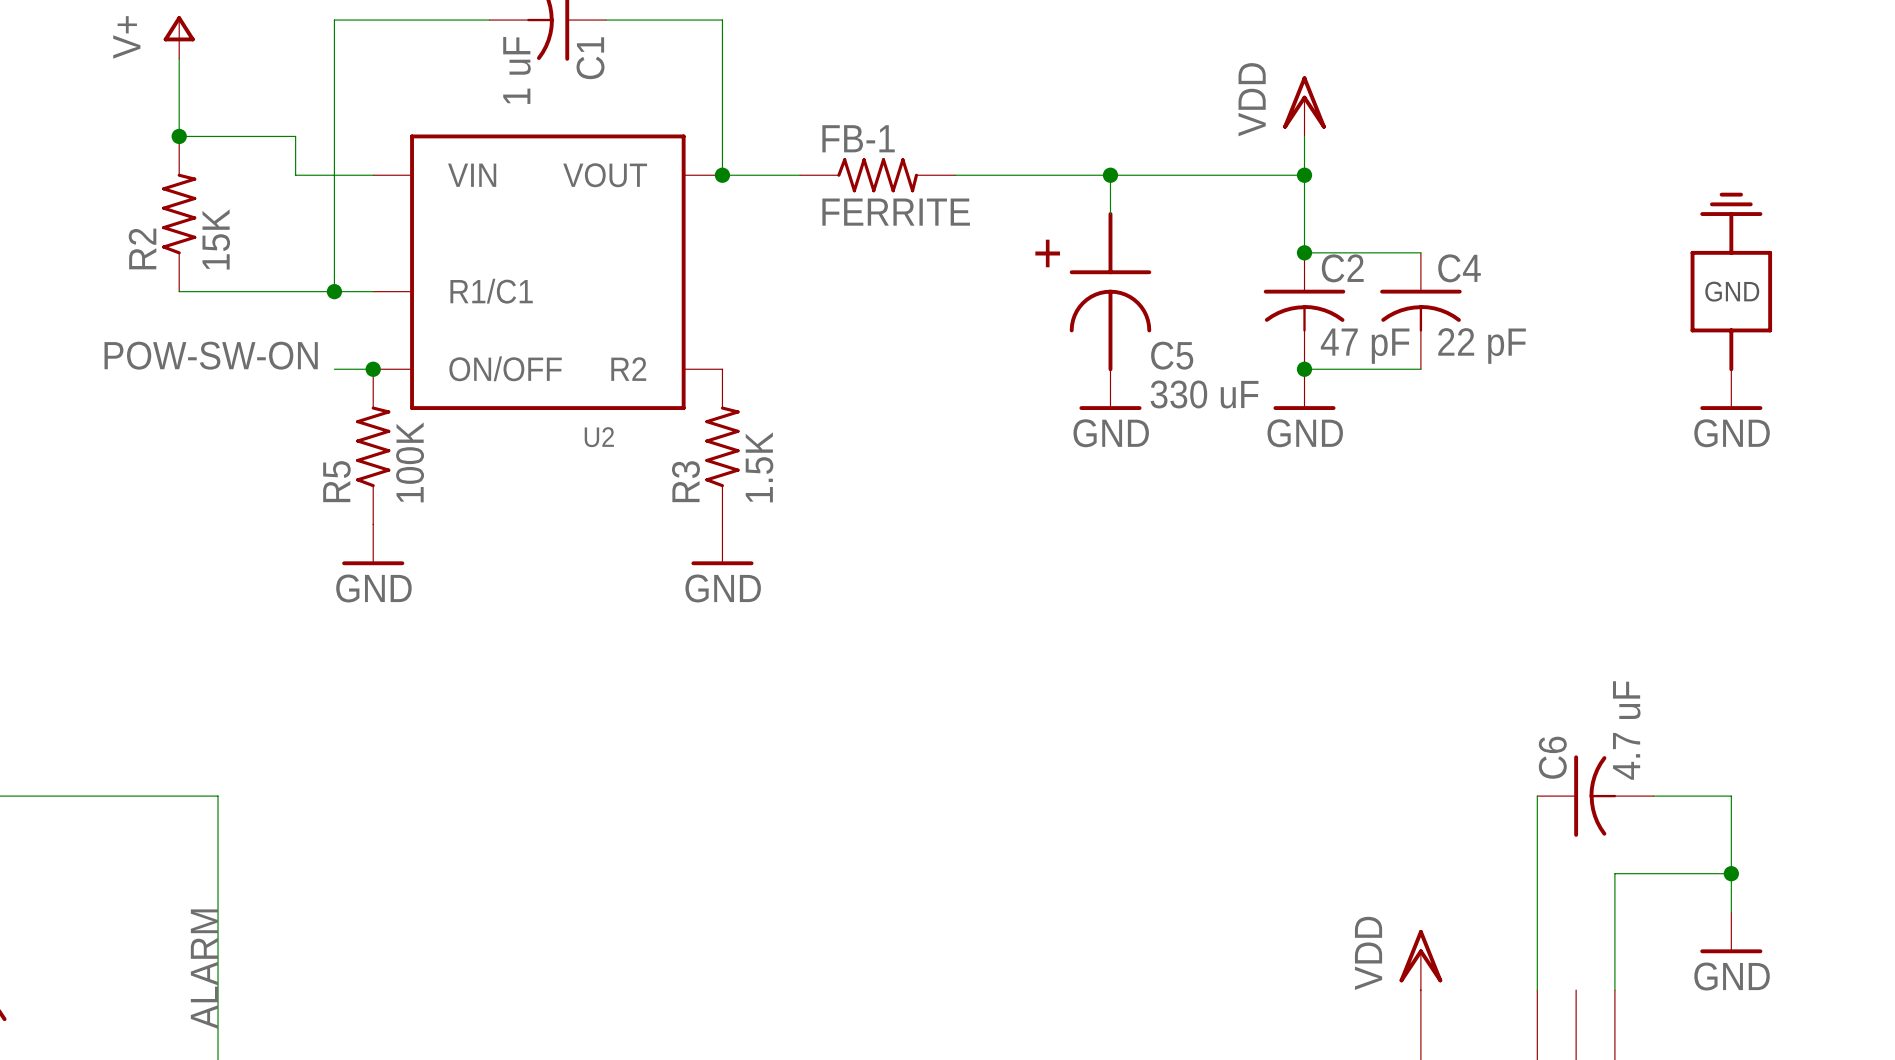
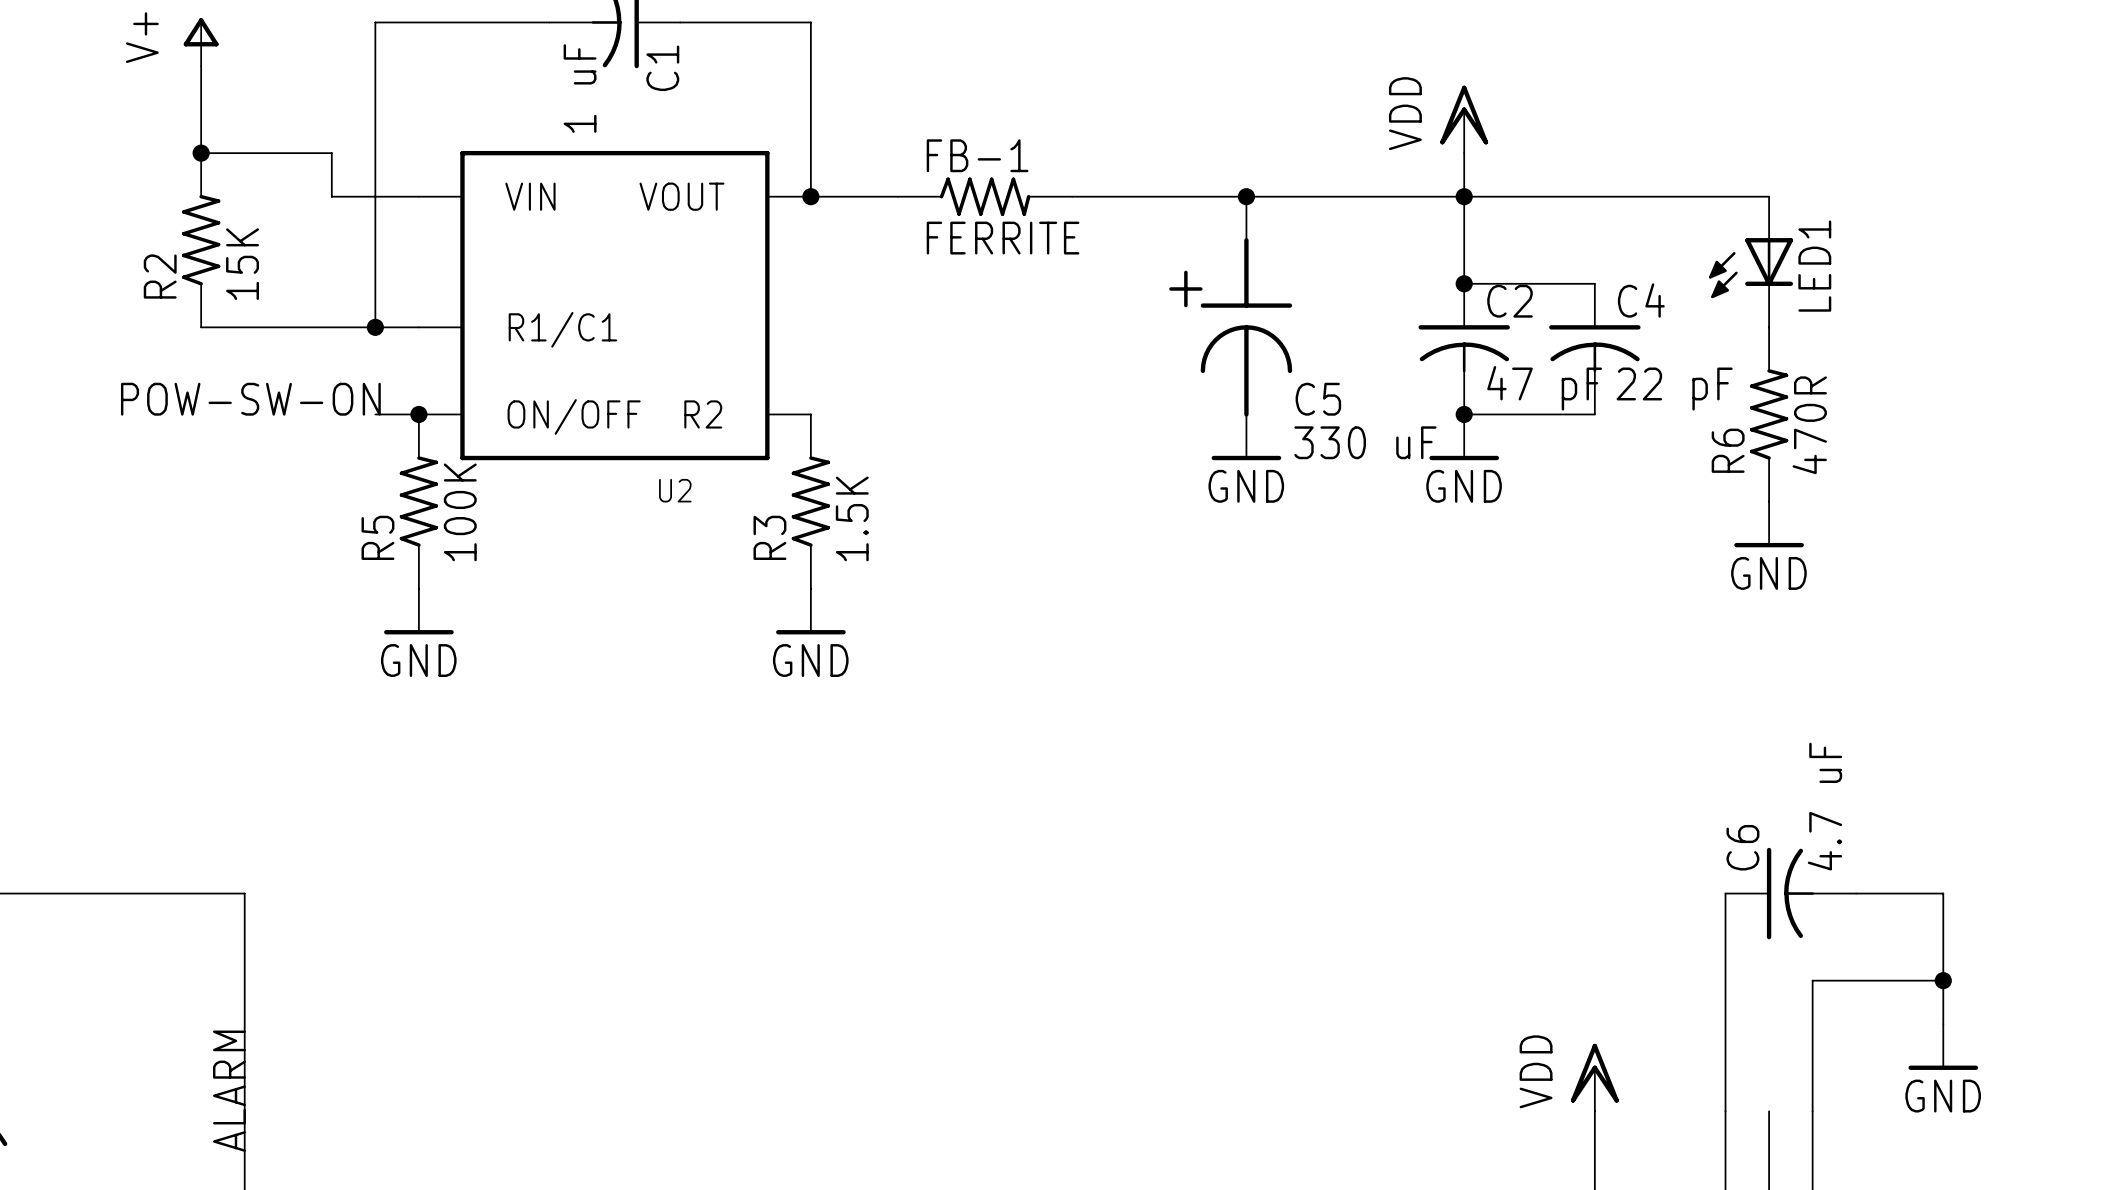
wire: none -> (1464, 196) (1769, 196)
LED1: none -> (1751, 262)
part: (1731, 281) -> none
R6: none -> 470R (1769, 414)
power symbol position: GND (1731, 389) -> GND (1769, 524)

